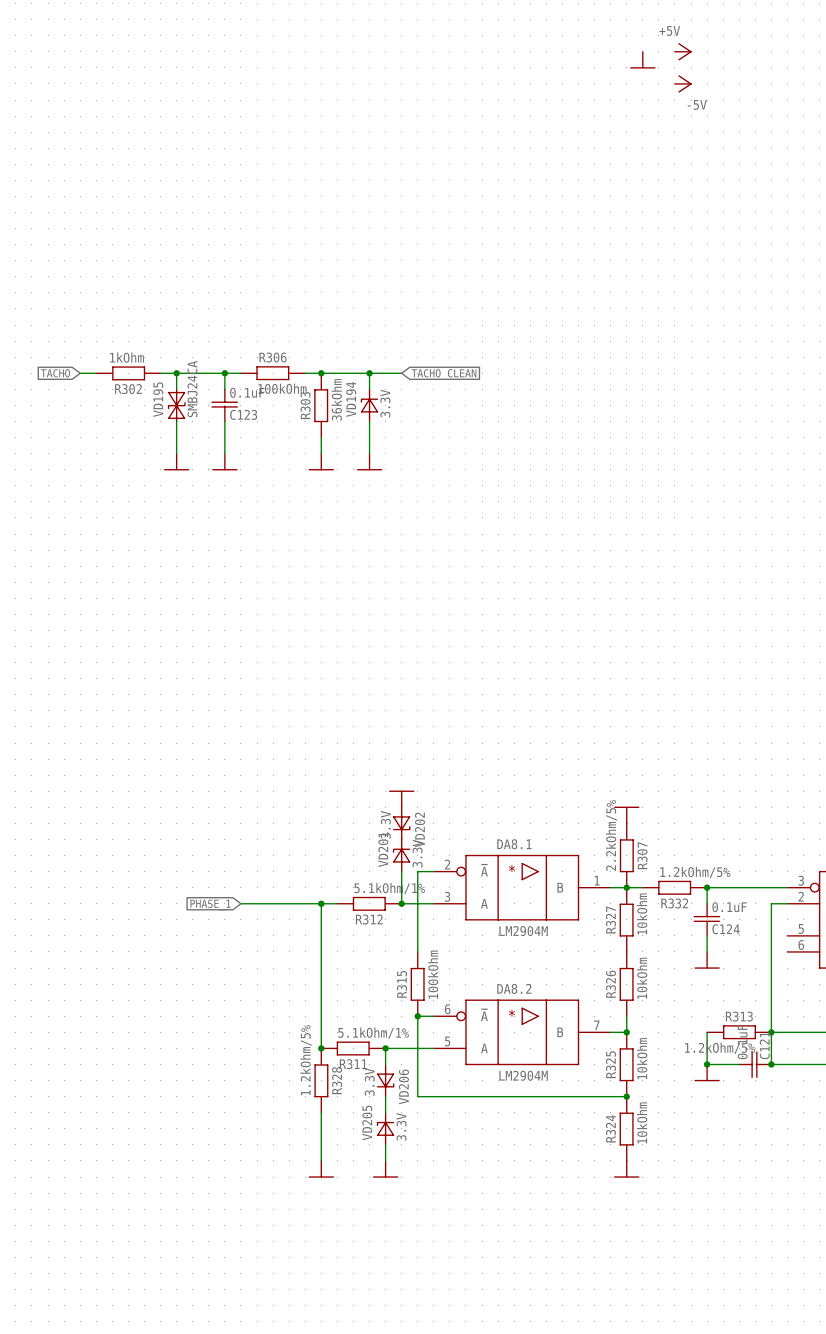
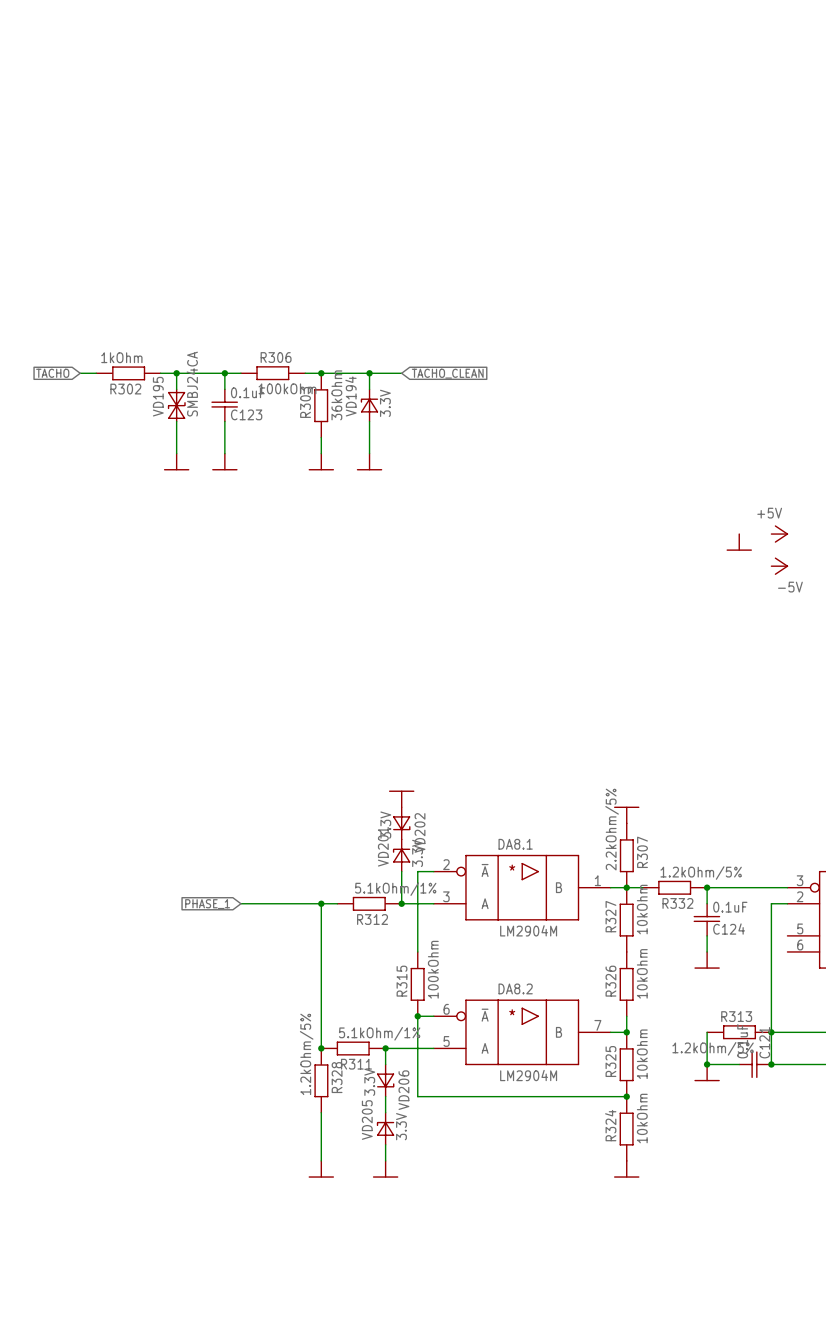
power symbol: +5V (683, 51) -> none
power symbol: (642, 60) -> none
power symbol: -5V (683, 83) -> none
power symbol: none -> +5V (779, 534)
power symbol: none -> (739, 542)
power symbol: none -> -5V (779, 566)

